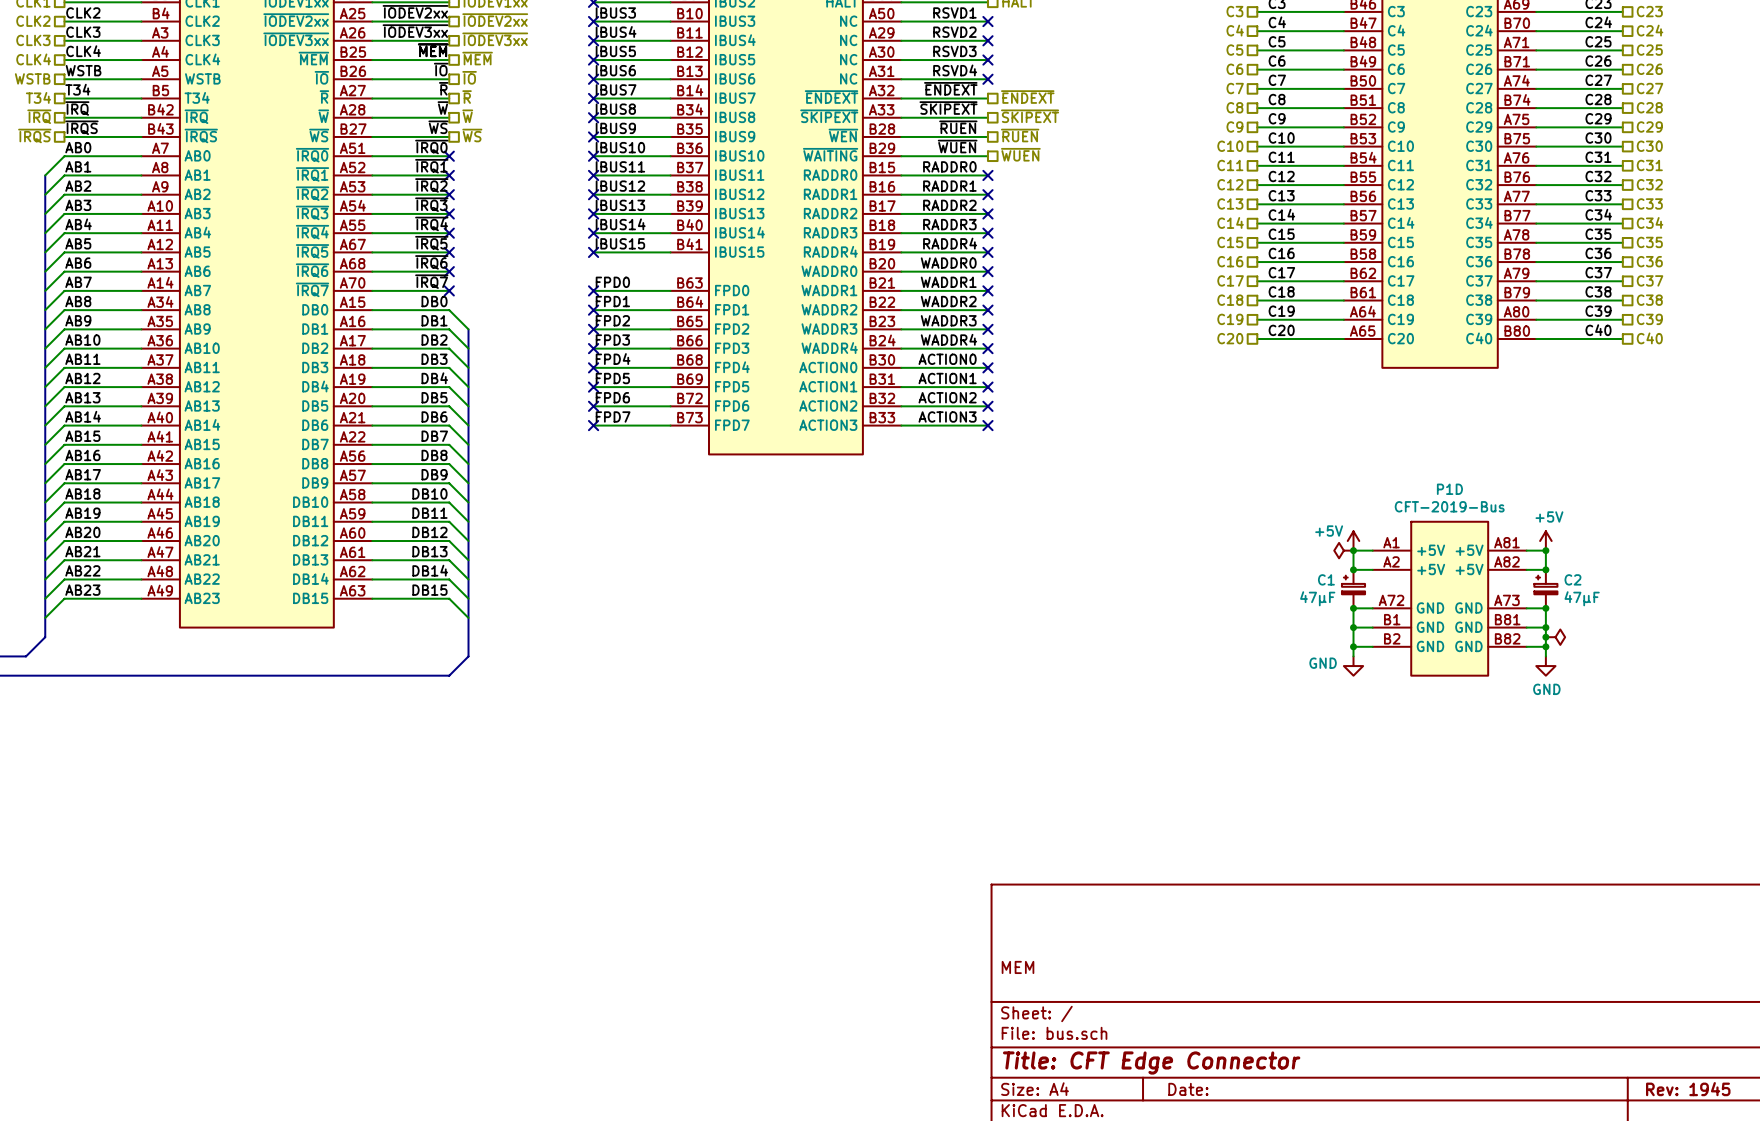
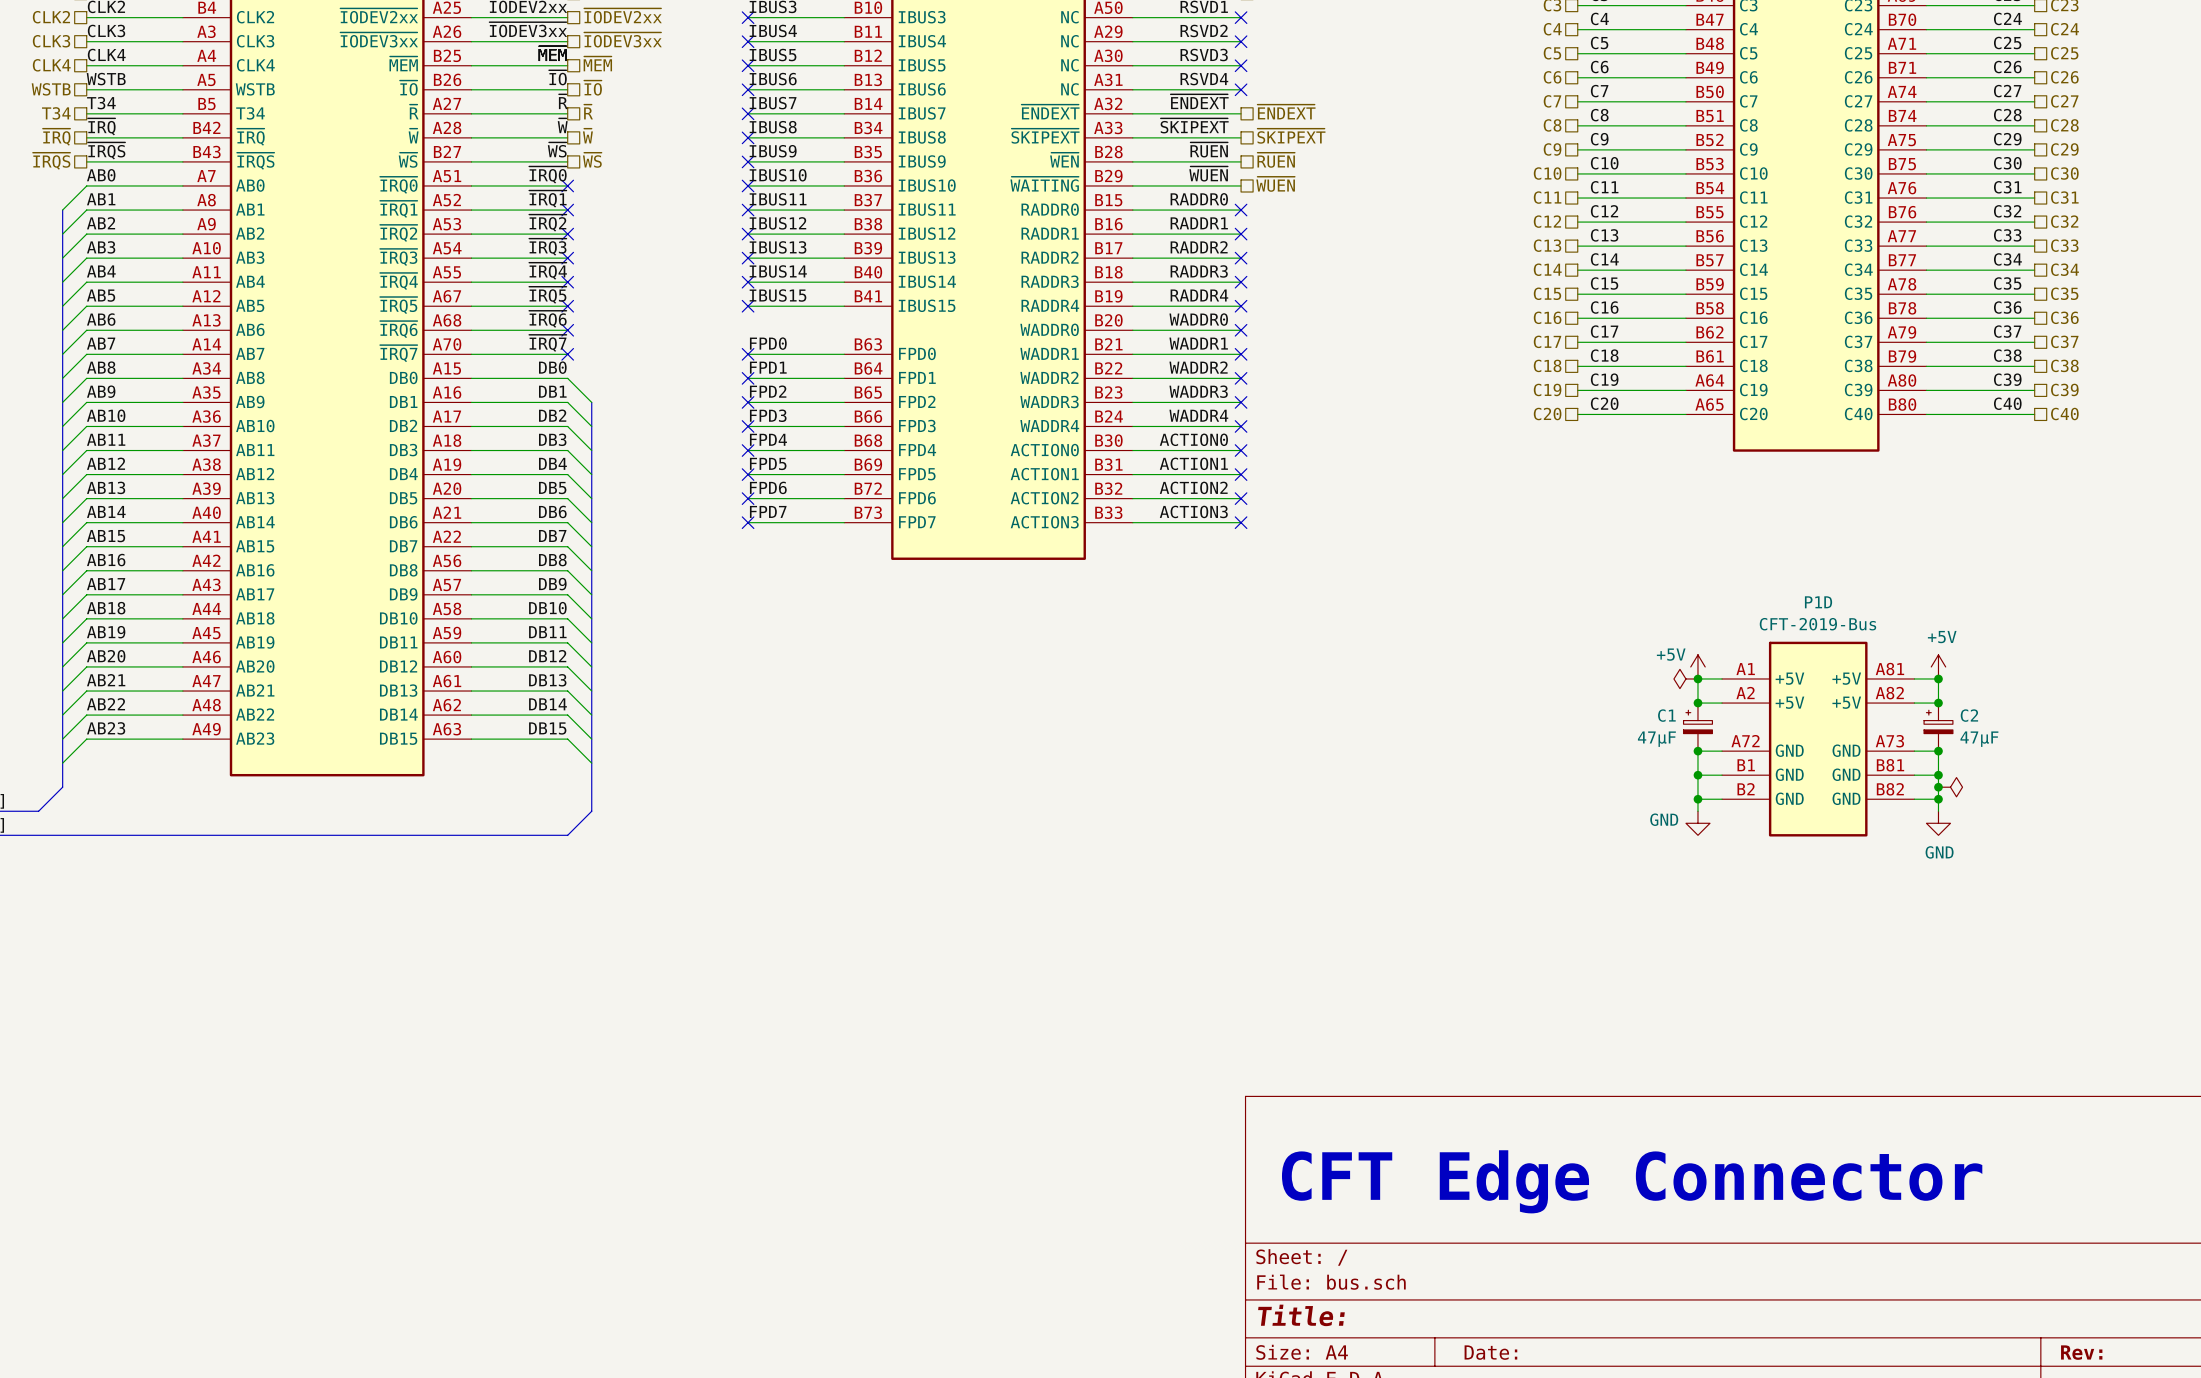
text: none -> CFT Edge Connector (1632, 1181)
title block: MEM (1017, 967) -> none
title block: Title: CFT Edge Connector (1151, 1063) -> Title: (1301, 1315)
title block: Rev: 1945 (1688, 1089) -> Rev: (2081, 1352)

